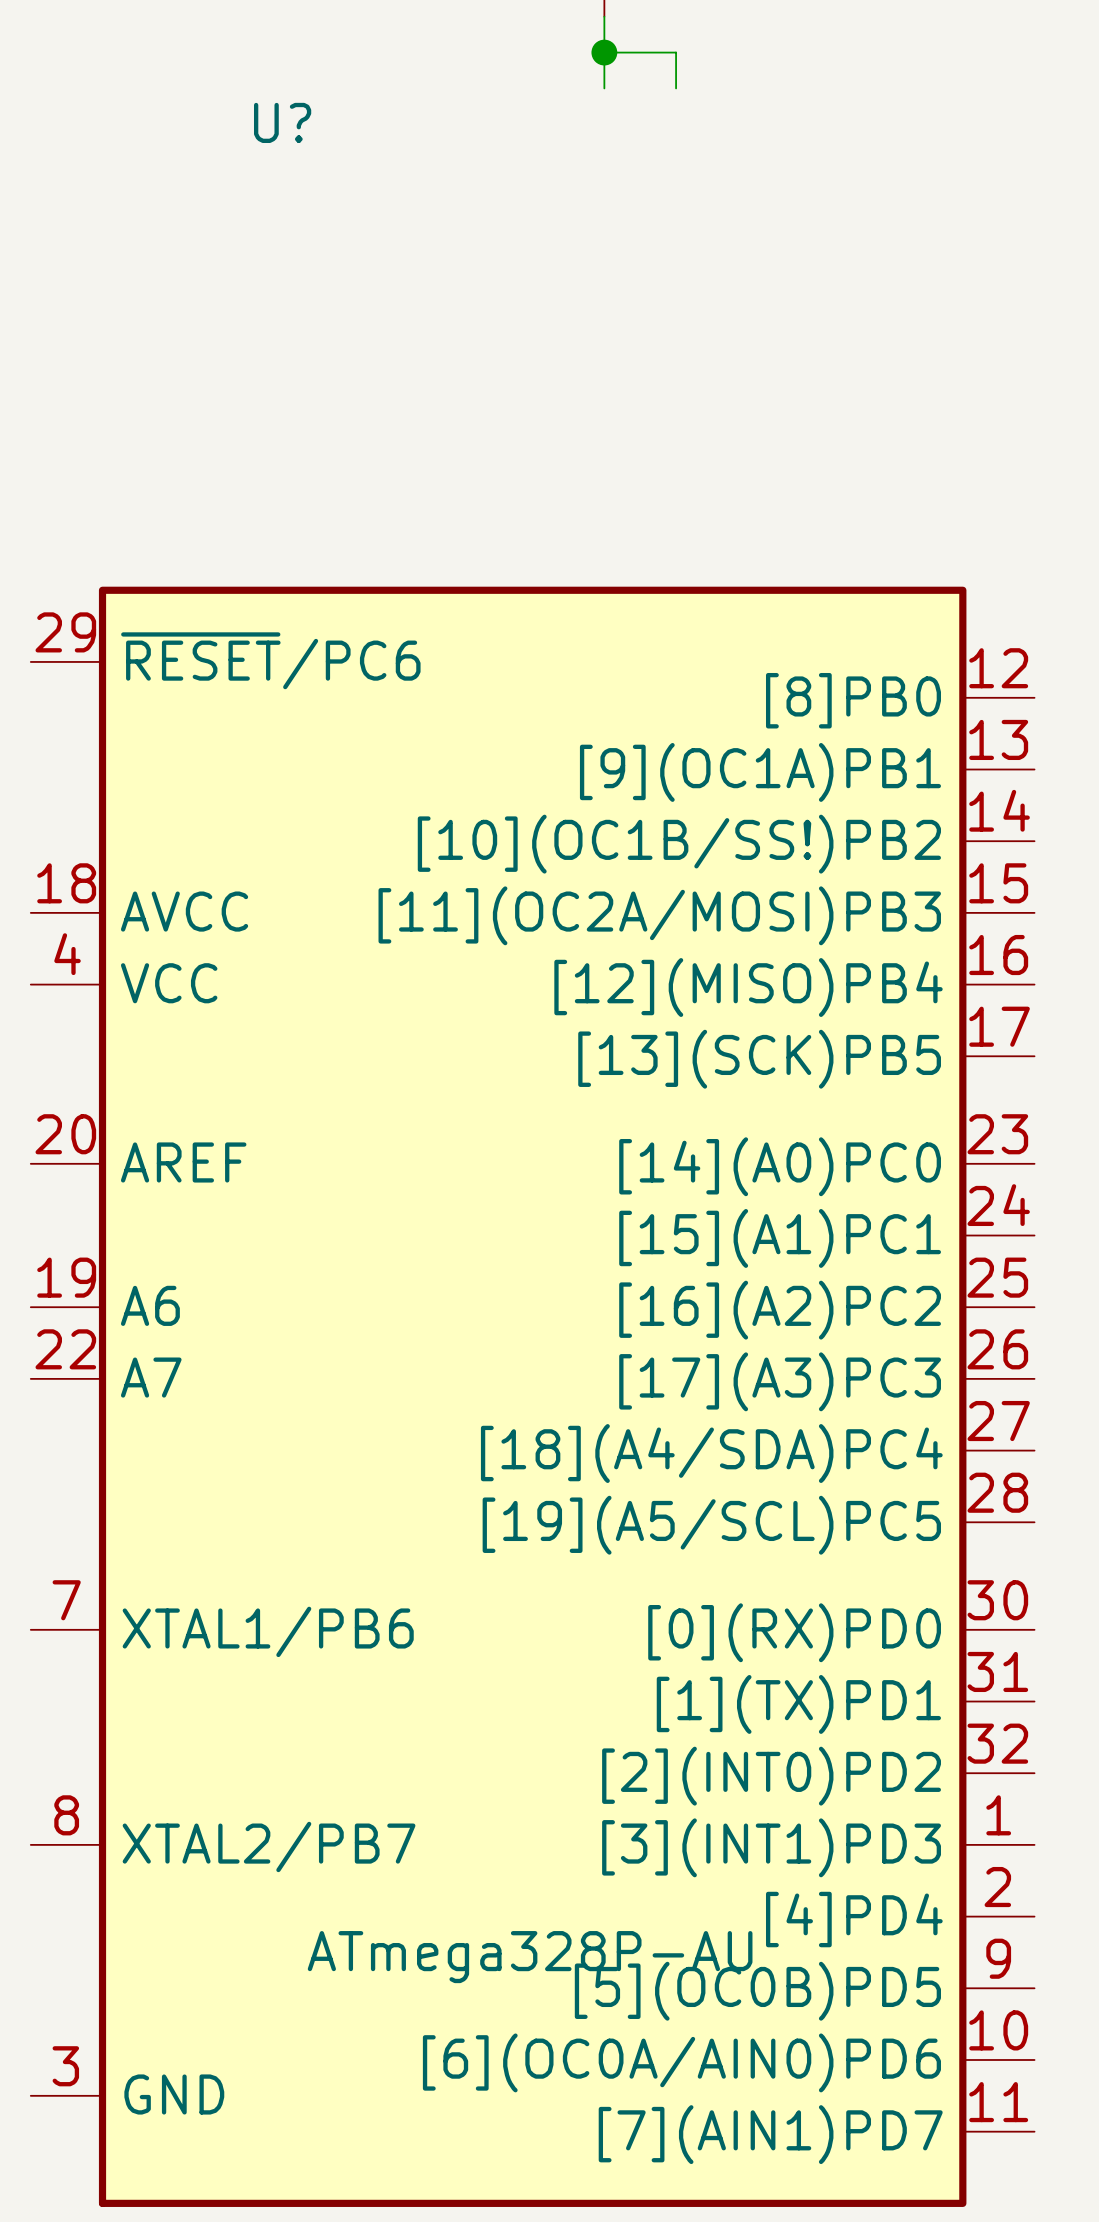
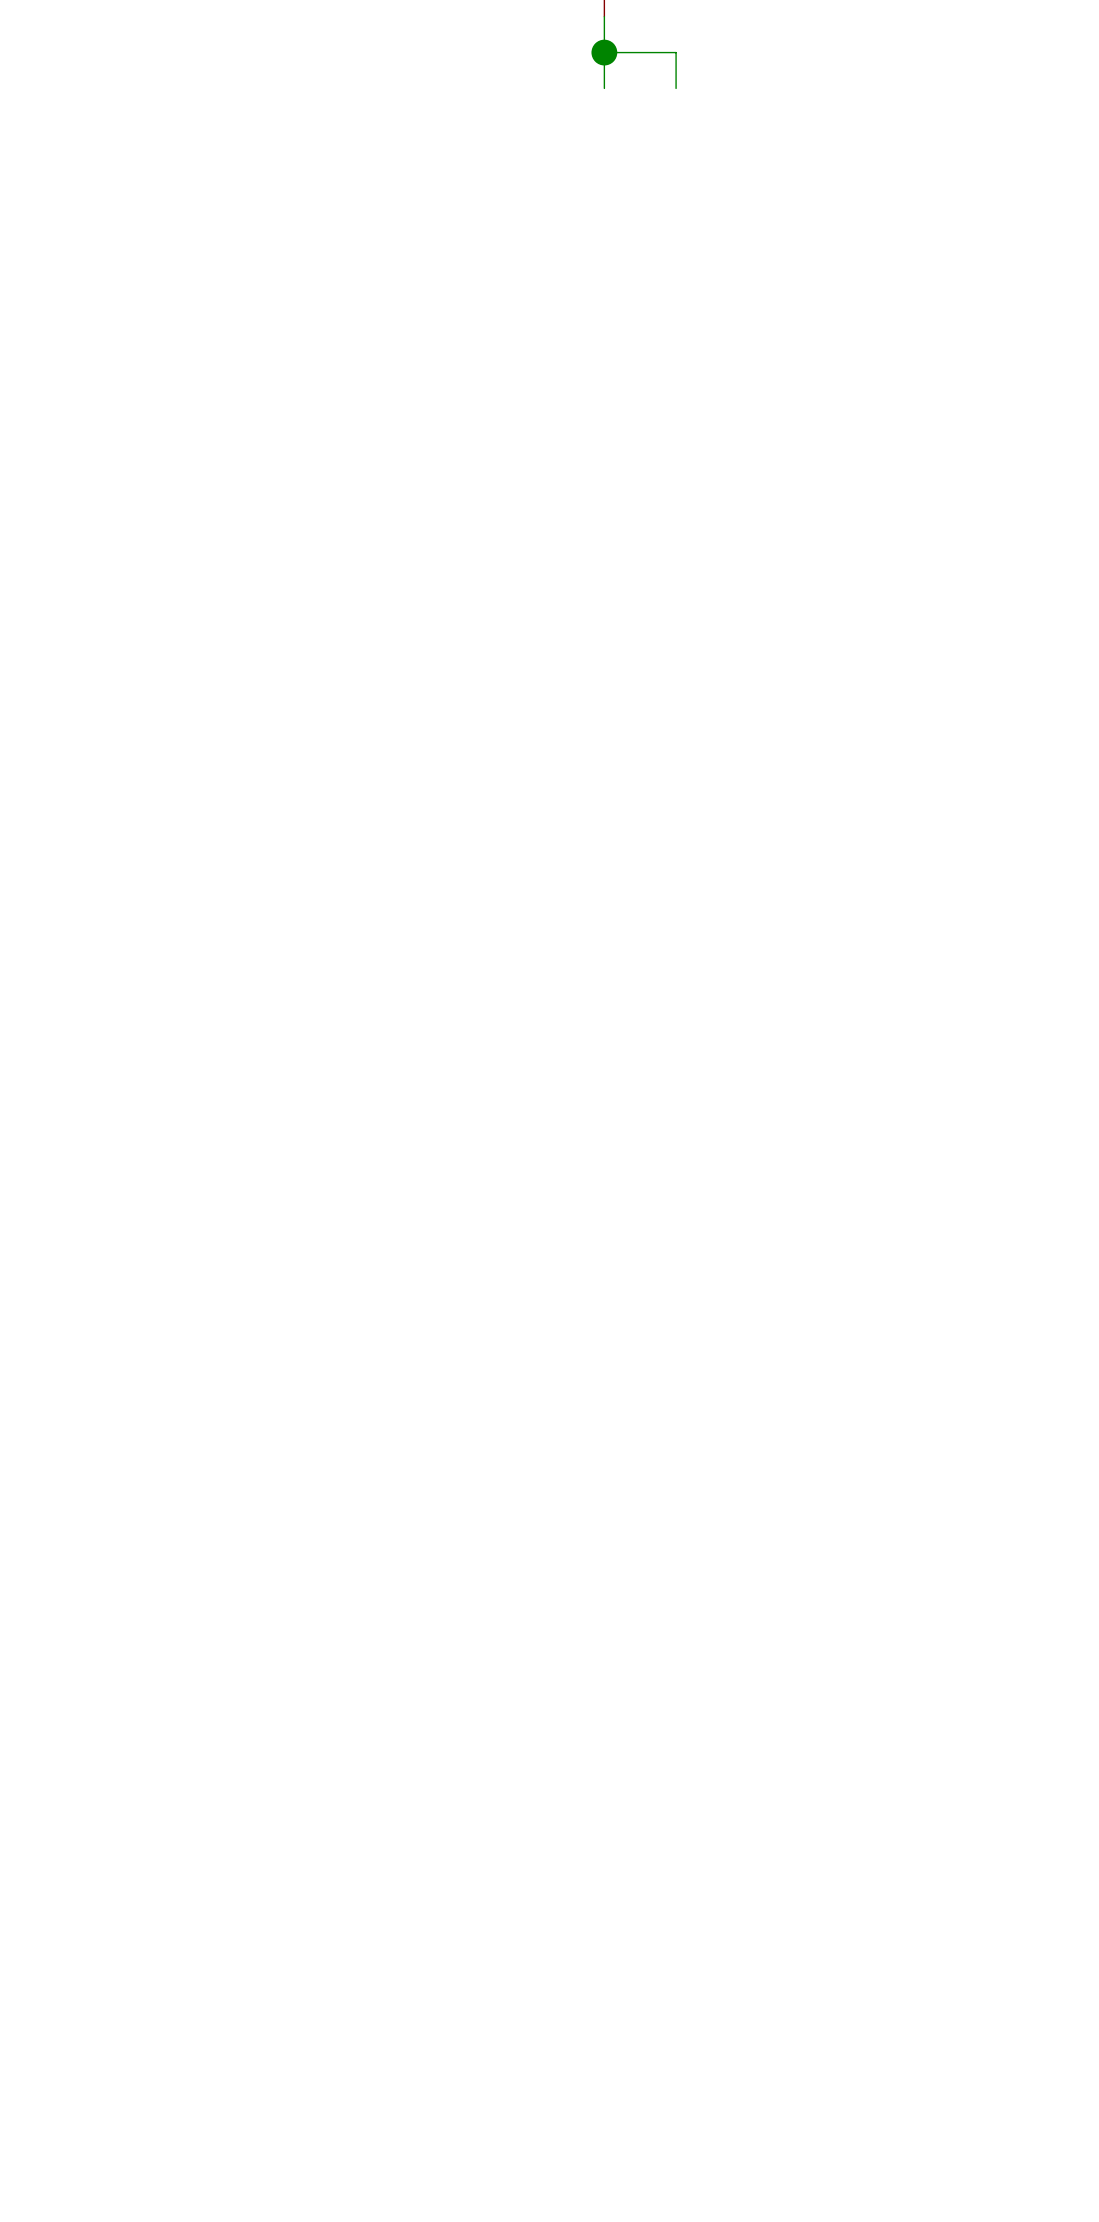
U?: ATmega328P-AU (532, 1396) -> none

